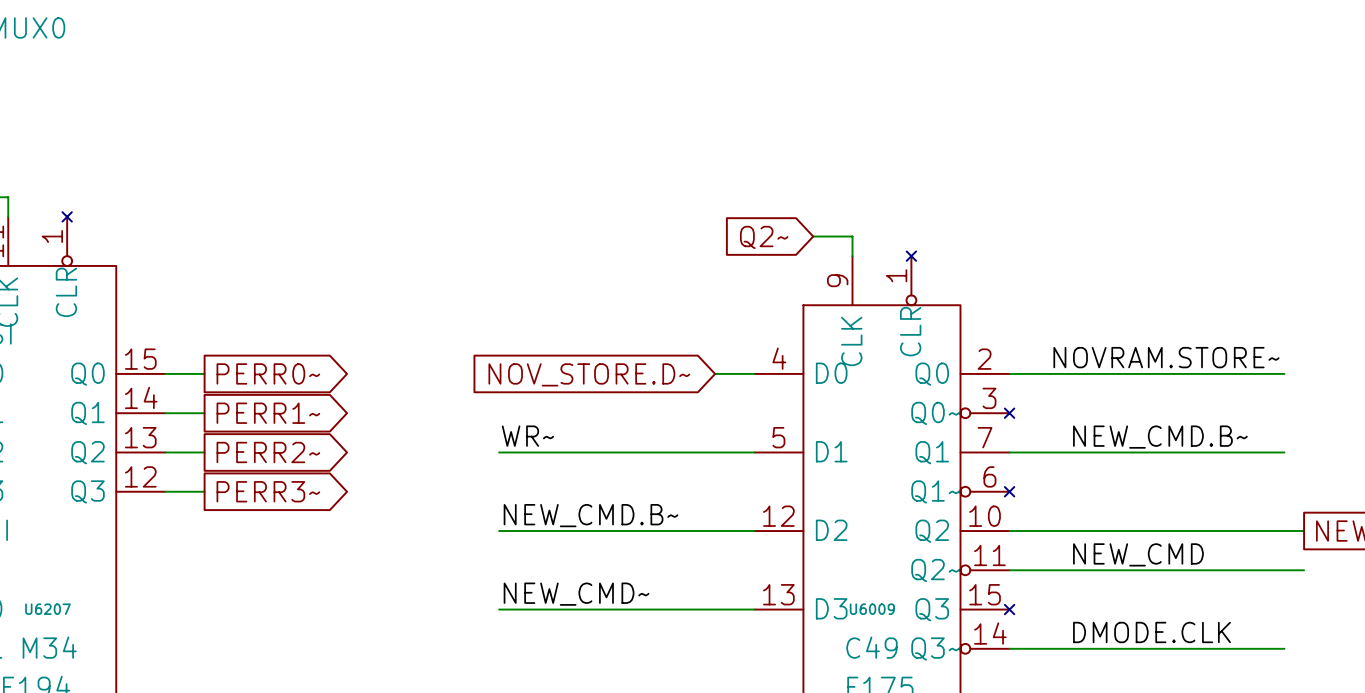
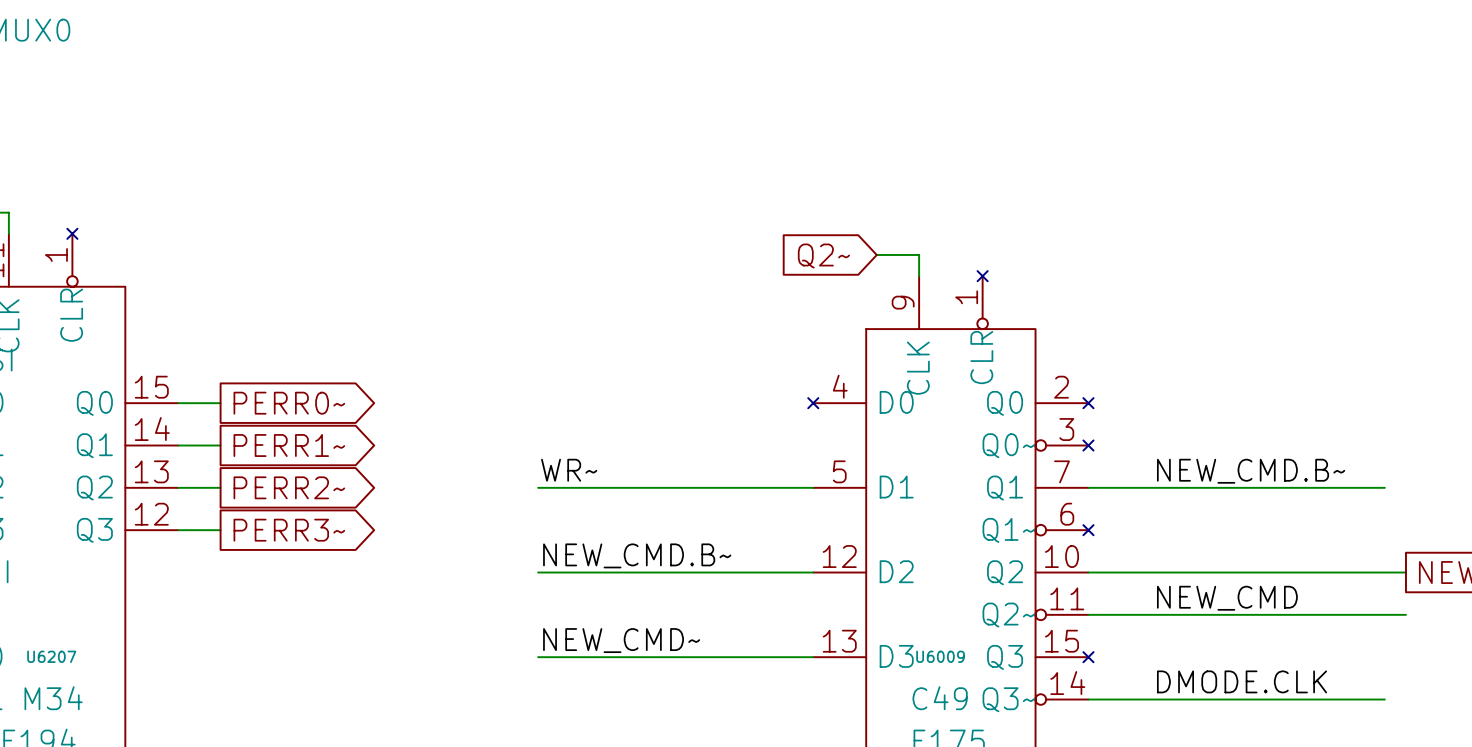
label: NOVRAM.STORE~ (1166, 357) -> none
wire: (715, 373) (754, 373) -> none
no-connect mark: none -> (813, 403)
wire: (1009, 373) (1284, 373) -> none
no-connect mark: none -> (1088, 403)
global label: NOV_STORE.D~ (589, 374) -> none

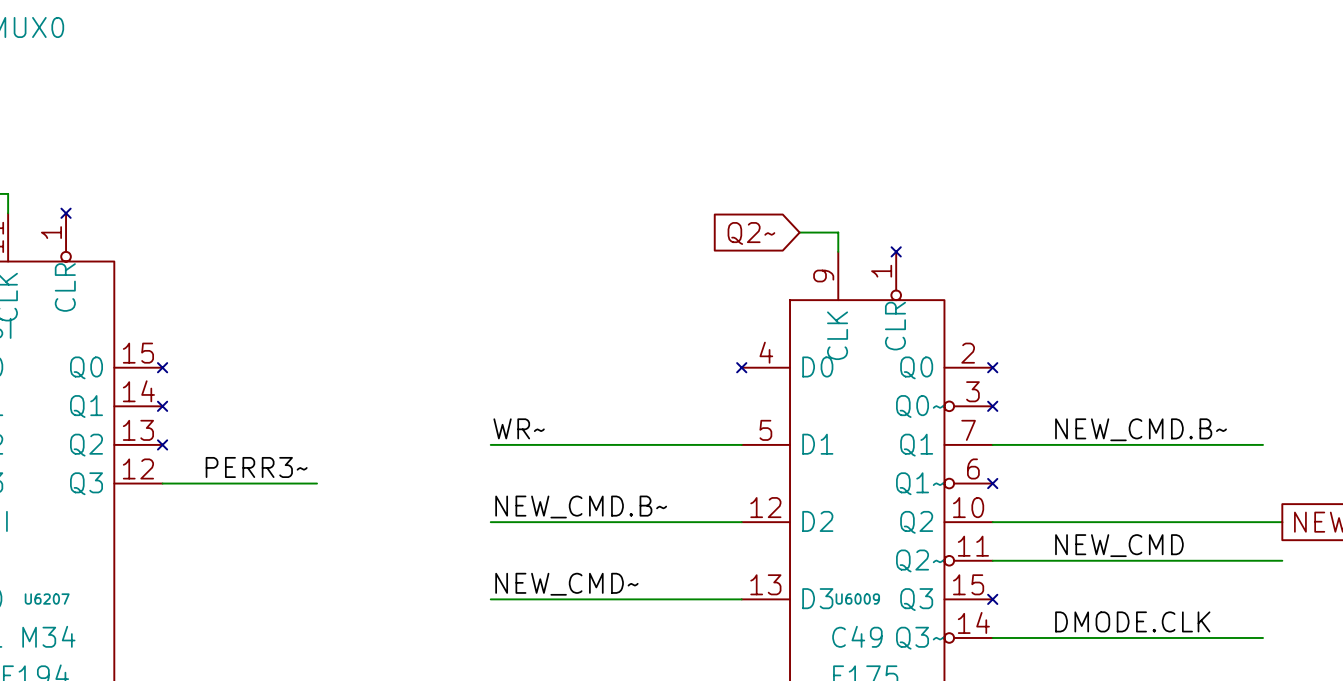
wire: (178, 403) (220, 403) -> none
no-connect mark: none -> (162, 367)
global label: PERR0~ (289, 403) -> none
wire: (178, 445) (220, 445) -> none
no-connect mark: none -> (162, 406)
global label: PERR1~ (289, 445) -> none
wire: (178, 487) (220, 487) -> none
no-connect mark: none -> (162, 444)
global label: PERR2~ (289, 487) -> none
label: none -> PERR3~ (256, 467)
wire: none -> (201, 483) (317, 483)
global label: PERR3~ (289, 530) -> none

